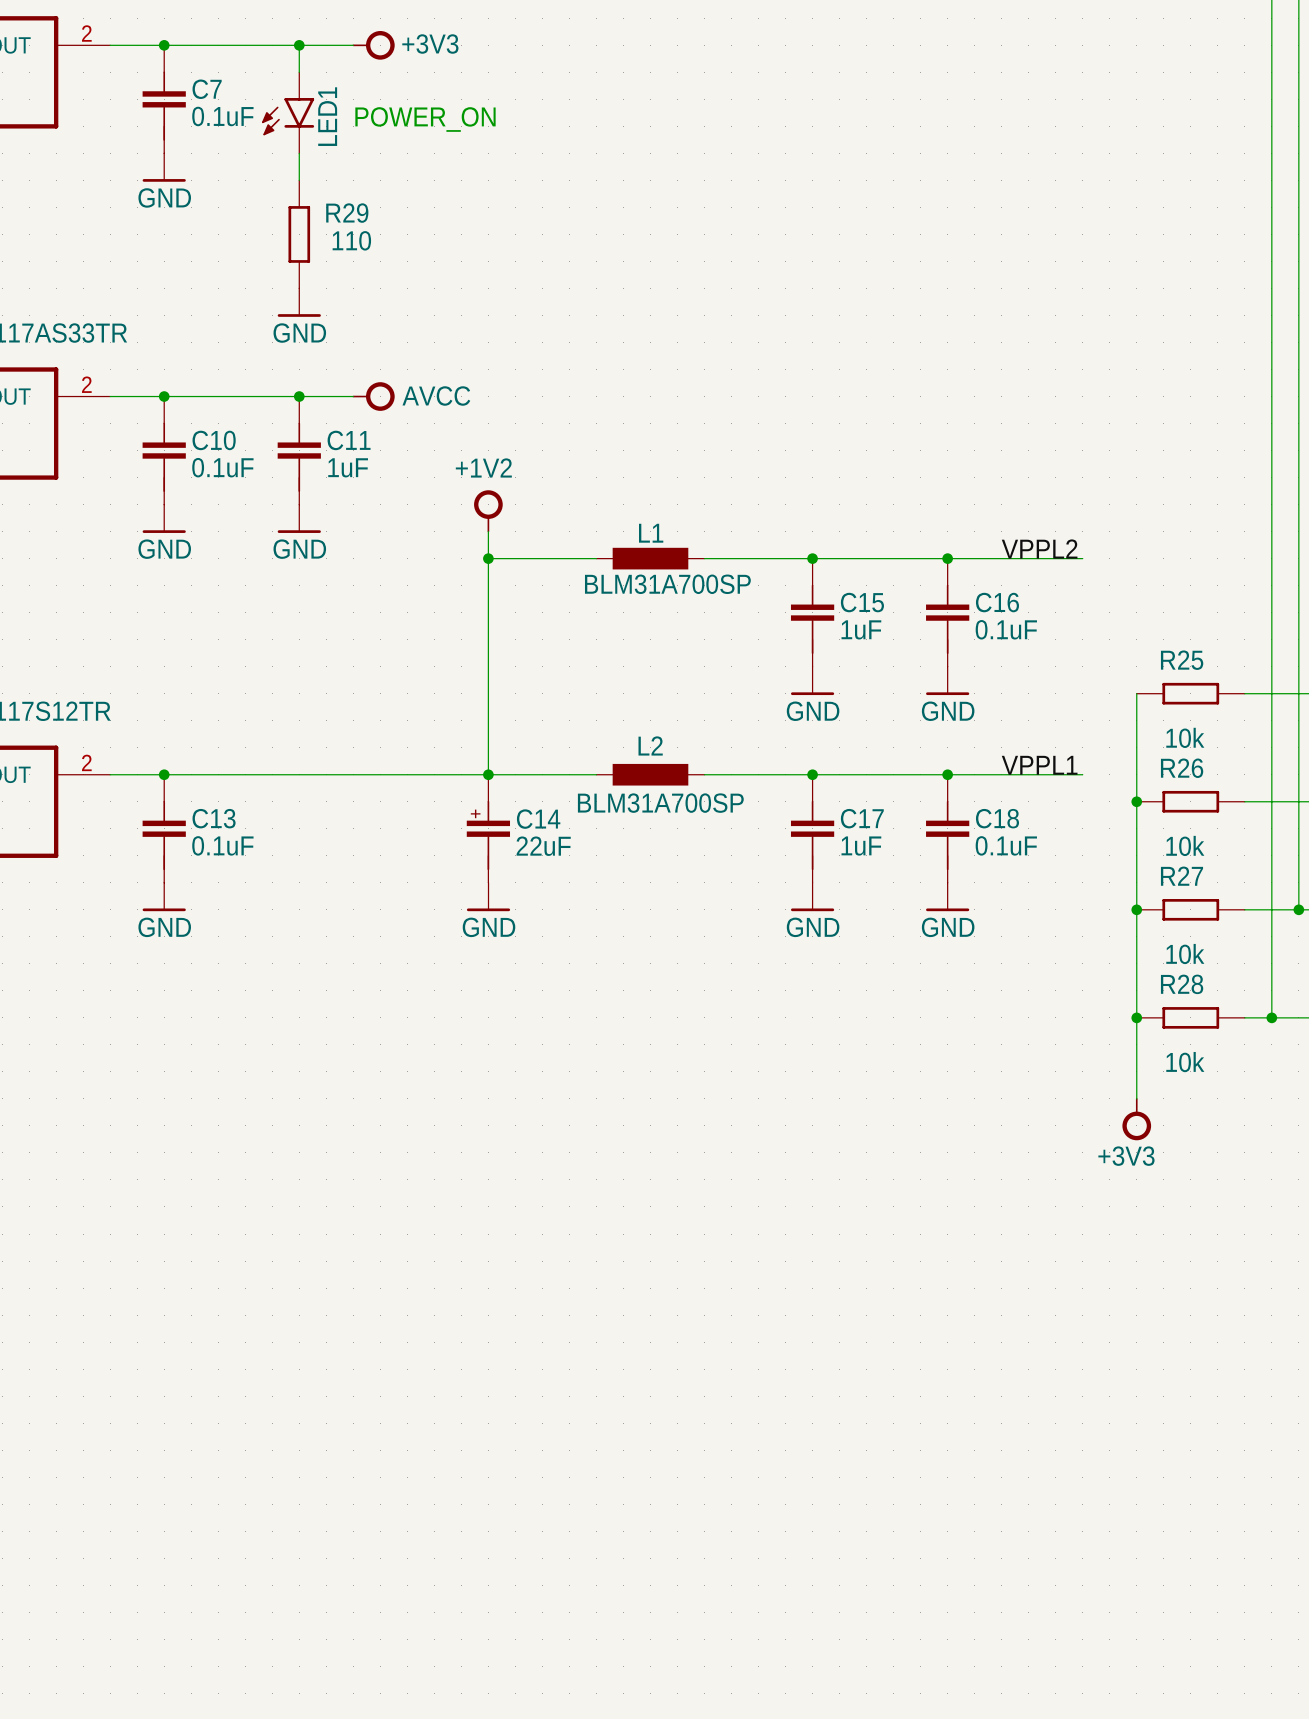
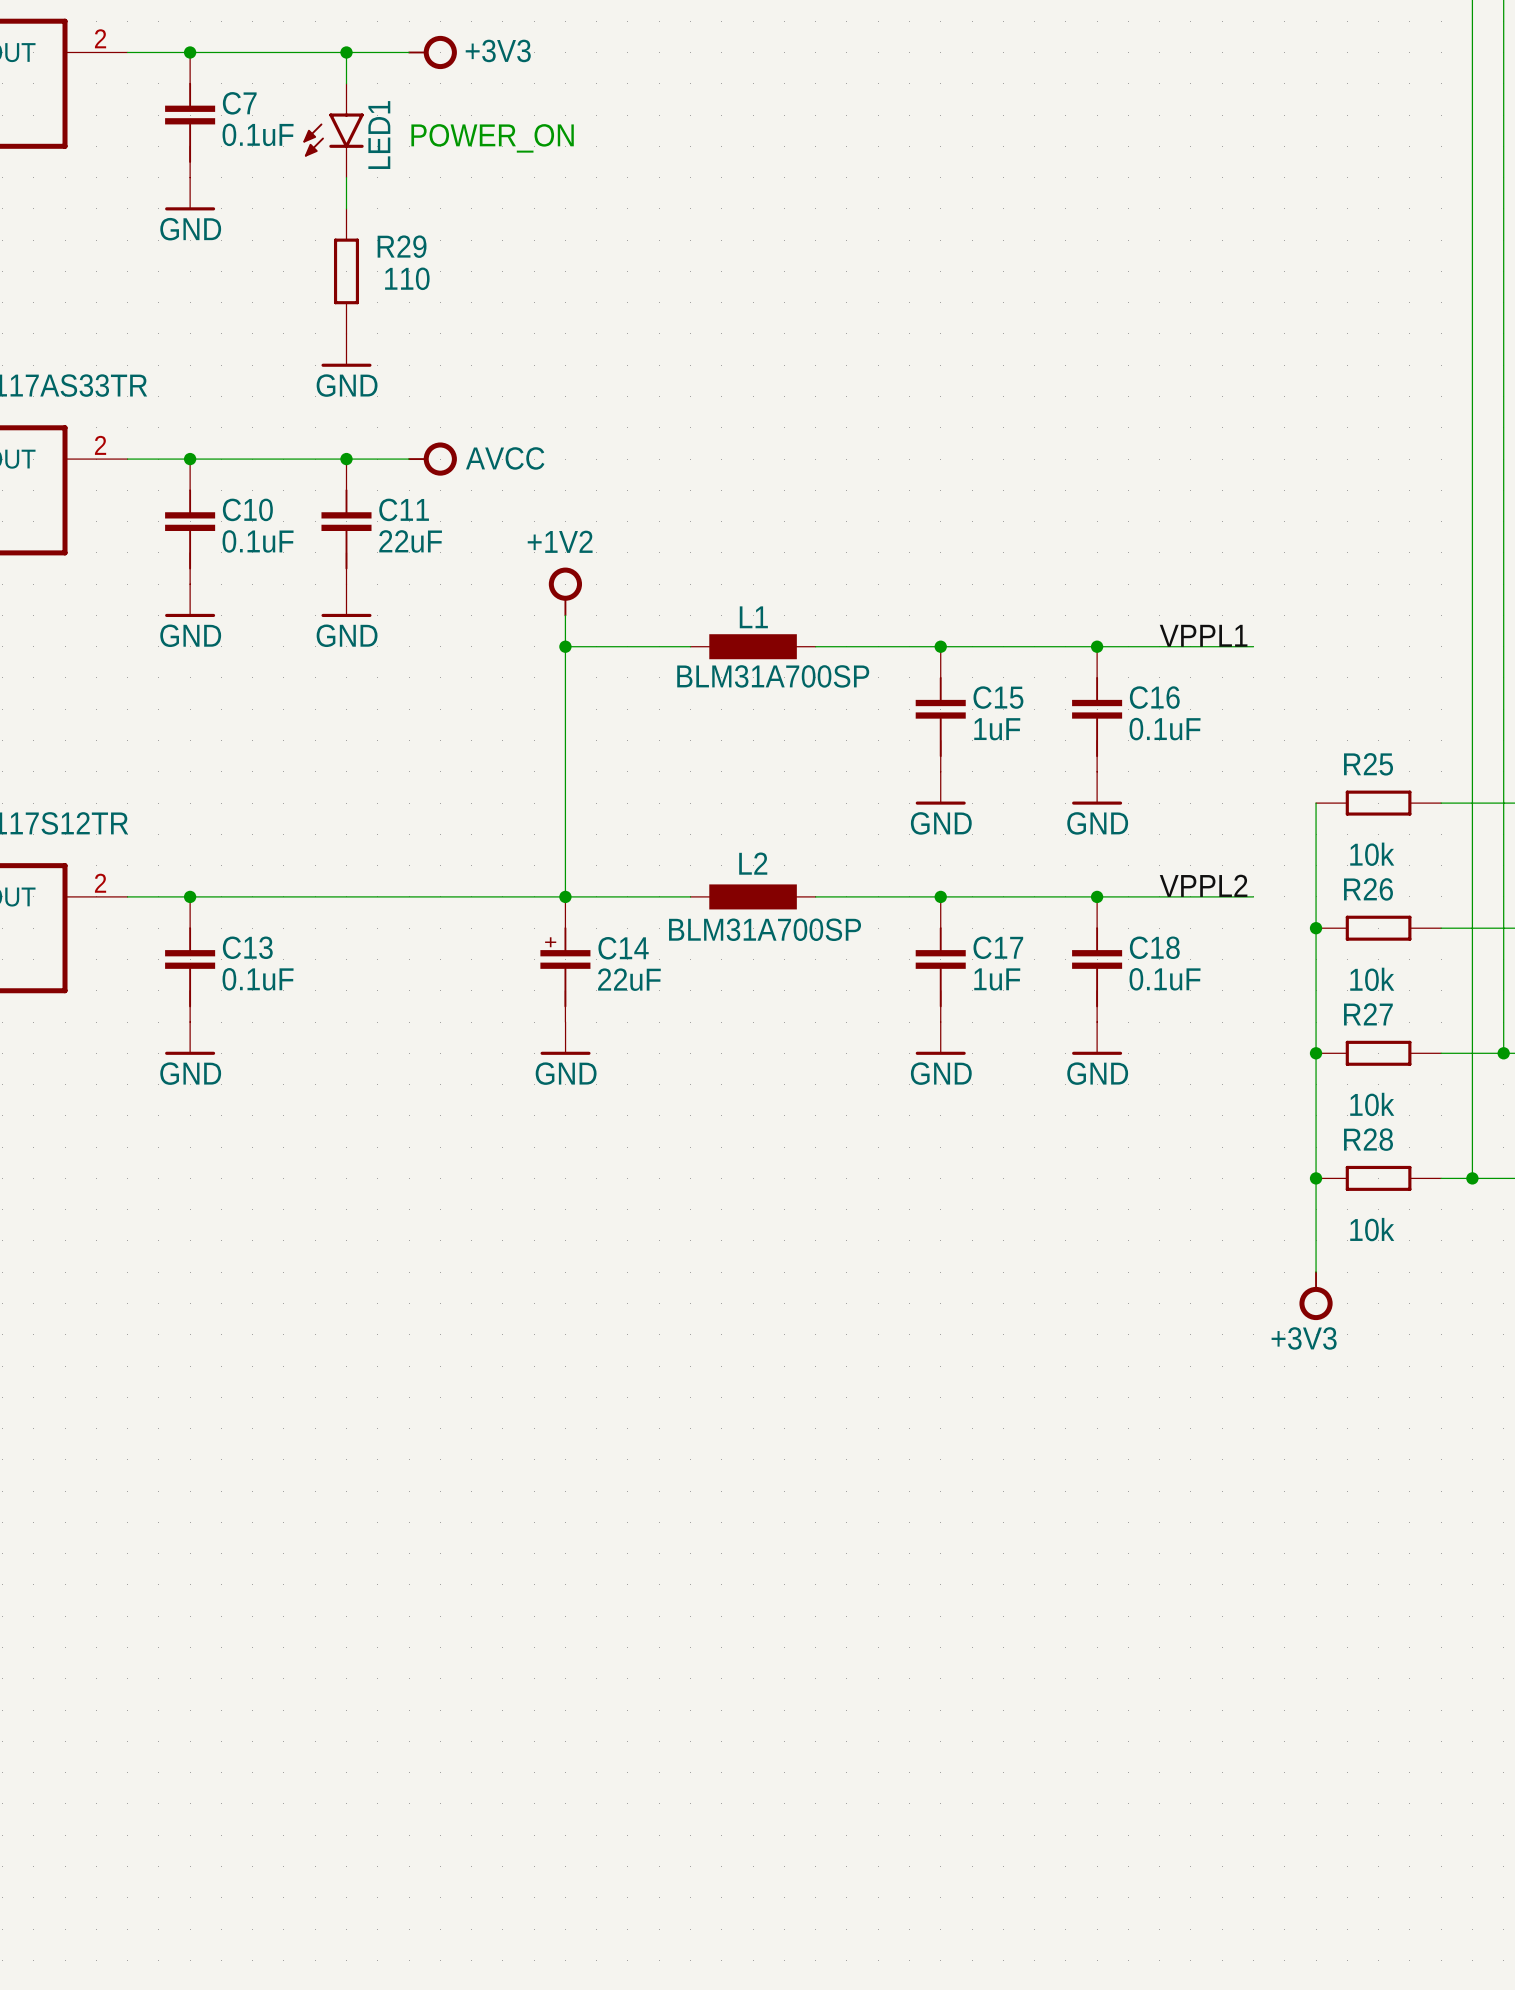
C11 value: 1uF (348, 467) -> 22uF (410, 541)
label: VPPL2 (1039, 549) -> VPPL1 (1203, 635)
label: VPPL1 (1039, 765) -> VPPL2 (1203, 885)

